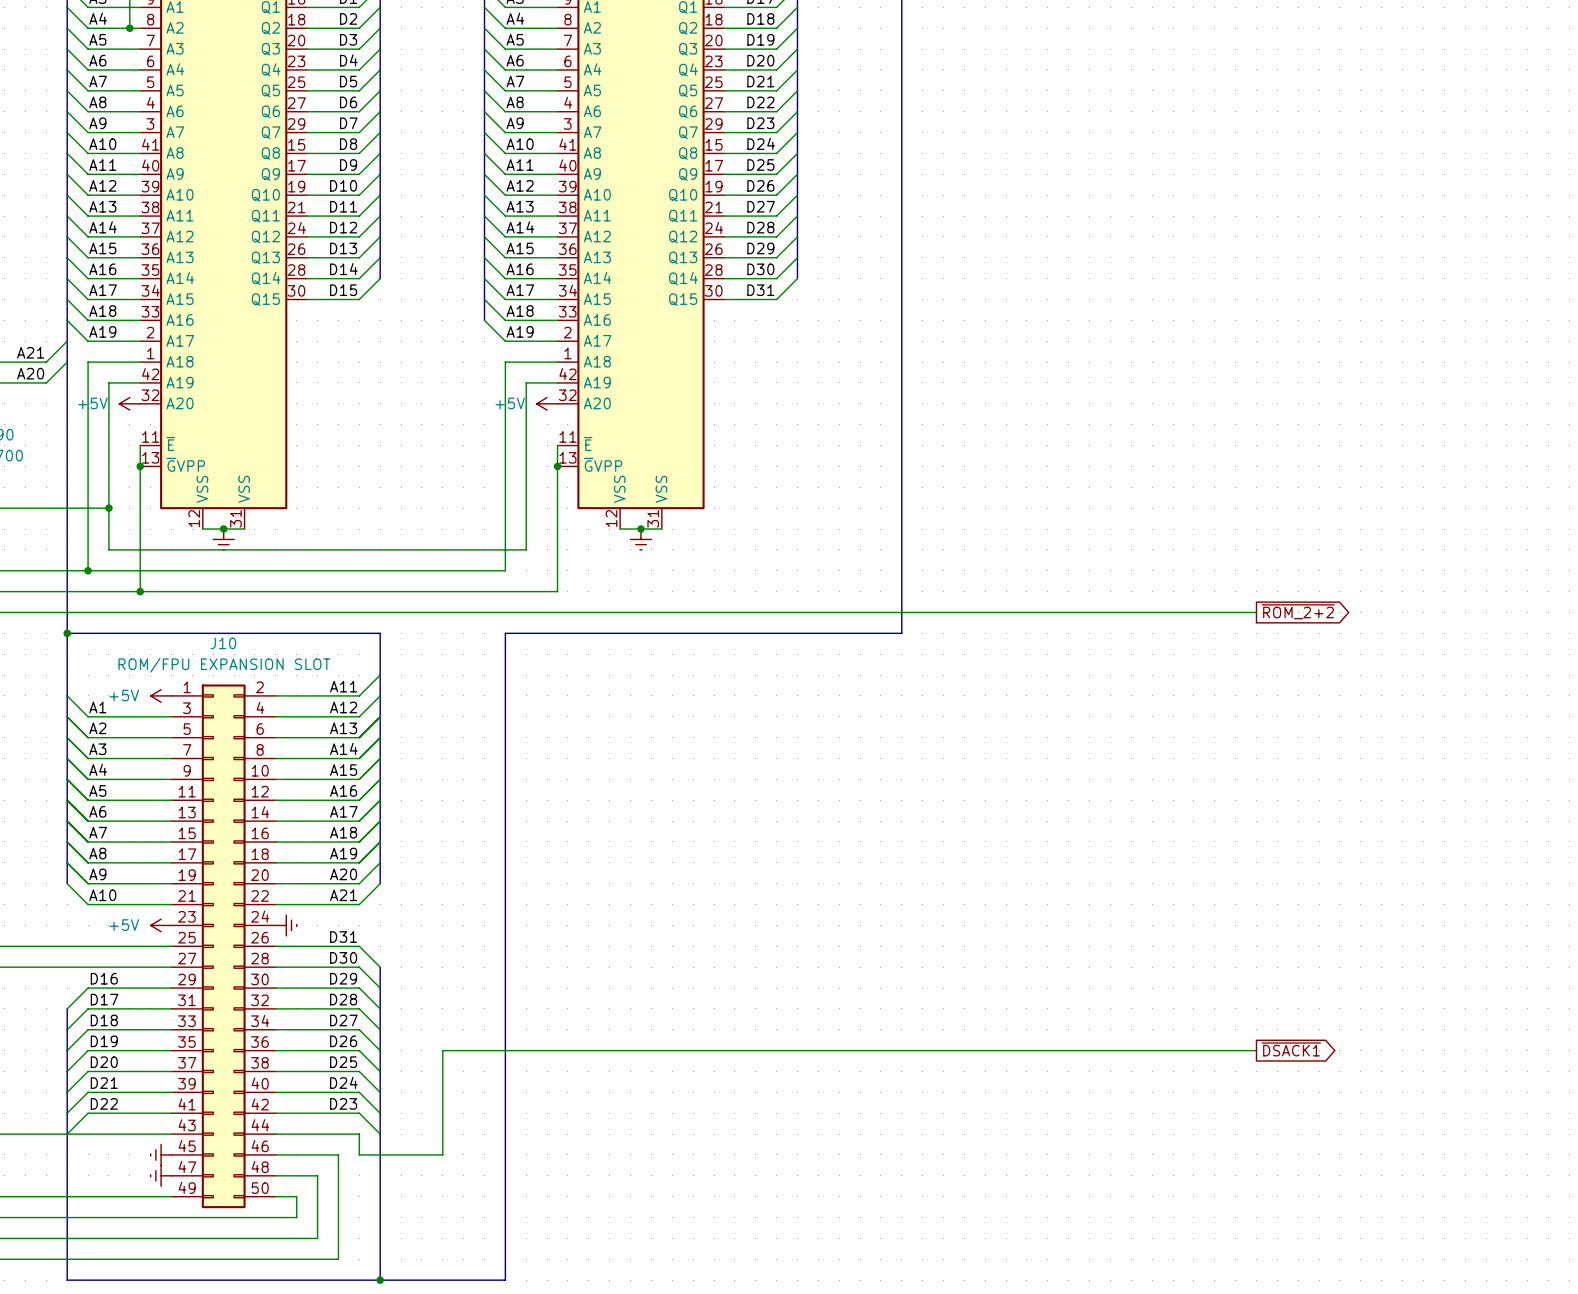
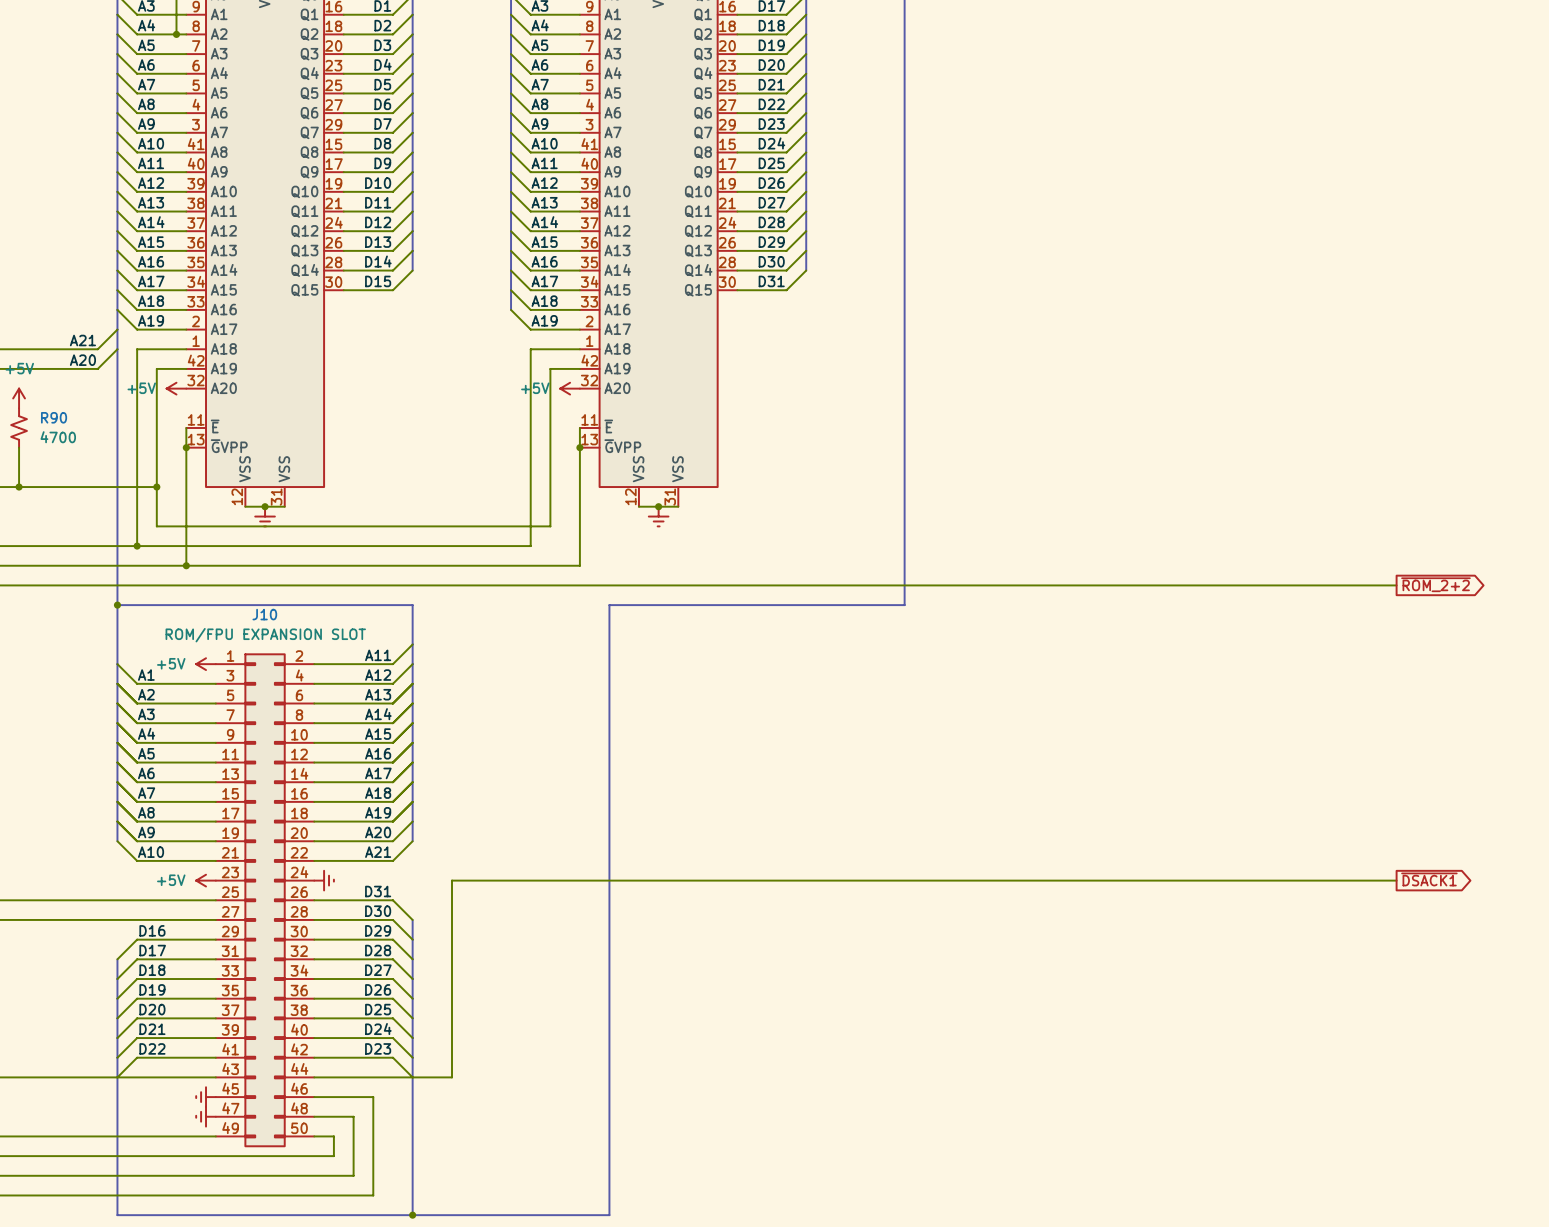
global label position: ~{ROM_2+2} (1298, 611) -> ~{ROM_2+2} (1435, 584)
wire: none -> (1239, 585) (1396, 585)
bus: (588, 633) (505, 633) (505, 1280) -> (609, 605) (609, 1215) (530, 1215)
global label: none -> ~{DSACK1} (1429, 879)
global label: ~{DSACK1} (1291, 1049) -> none
wire: (1256, 1050) (442, 1050) (442, 1154) (359, 1154) (359, 1134) -> (1396, 880) (452, 880) (452, 1077) (392, 1077)

